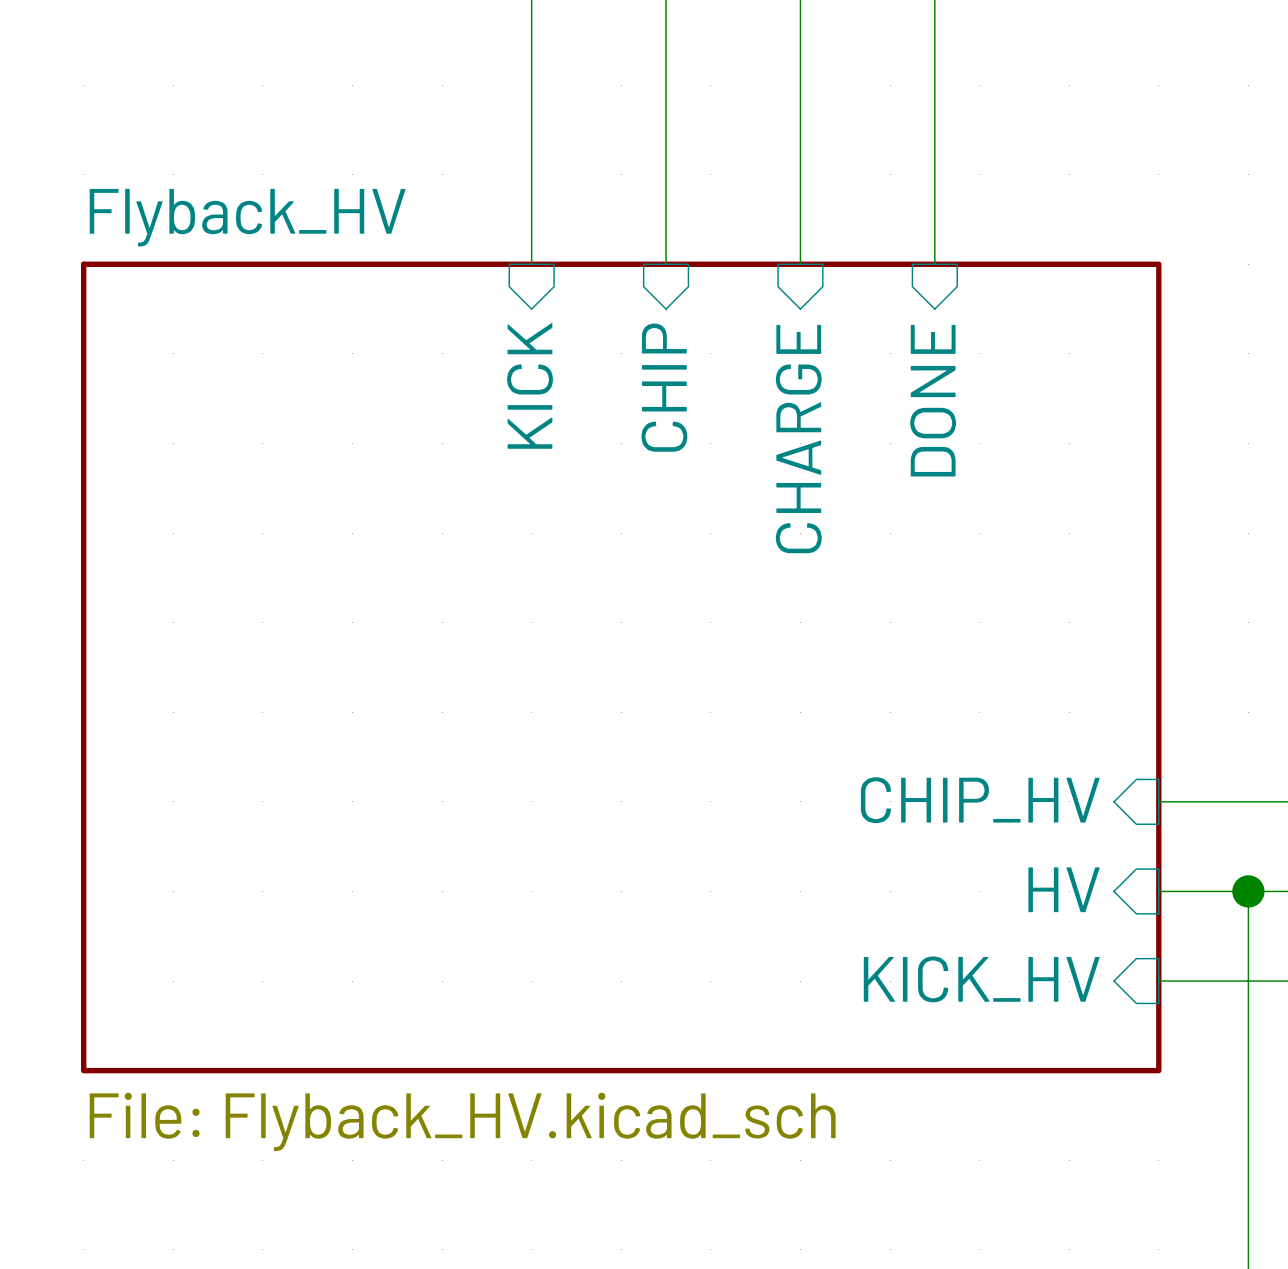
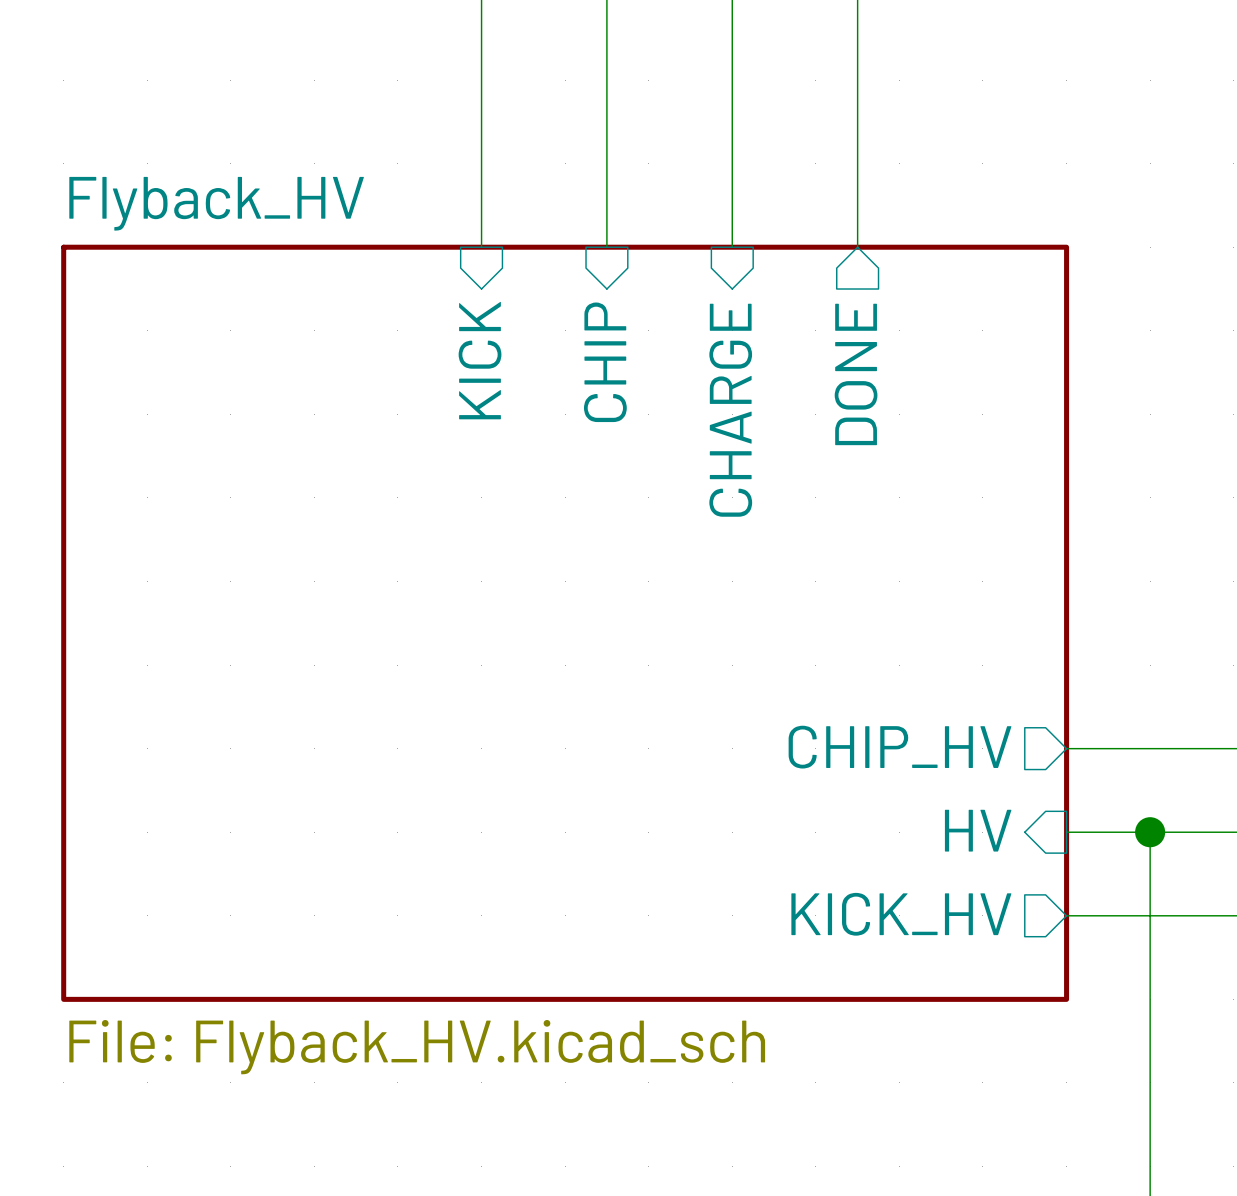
sheet pin shape: input (933, 400) -> output (856, 374)
sheet pin shape: input (980, 800) -> output (900, 747)
sheet pin shape: input (981, 979) -> output (901, 914)

